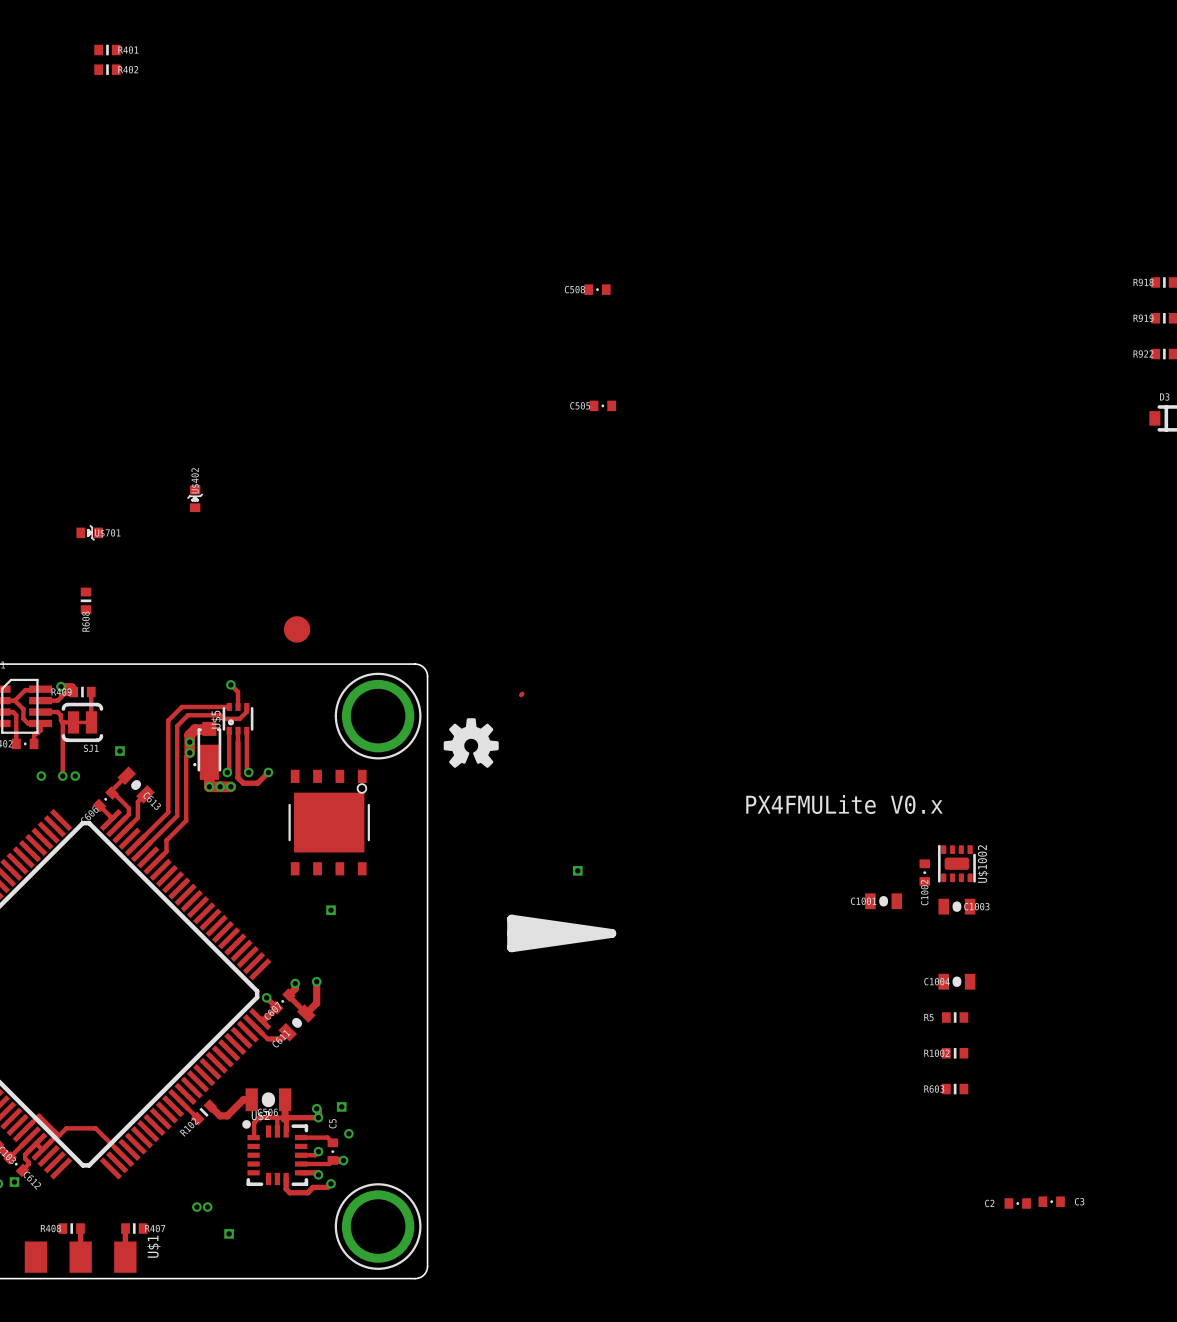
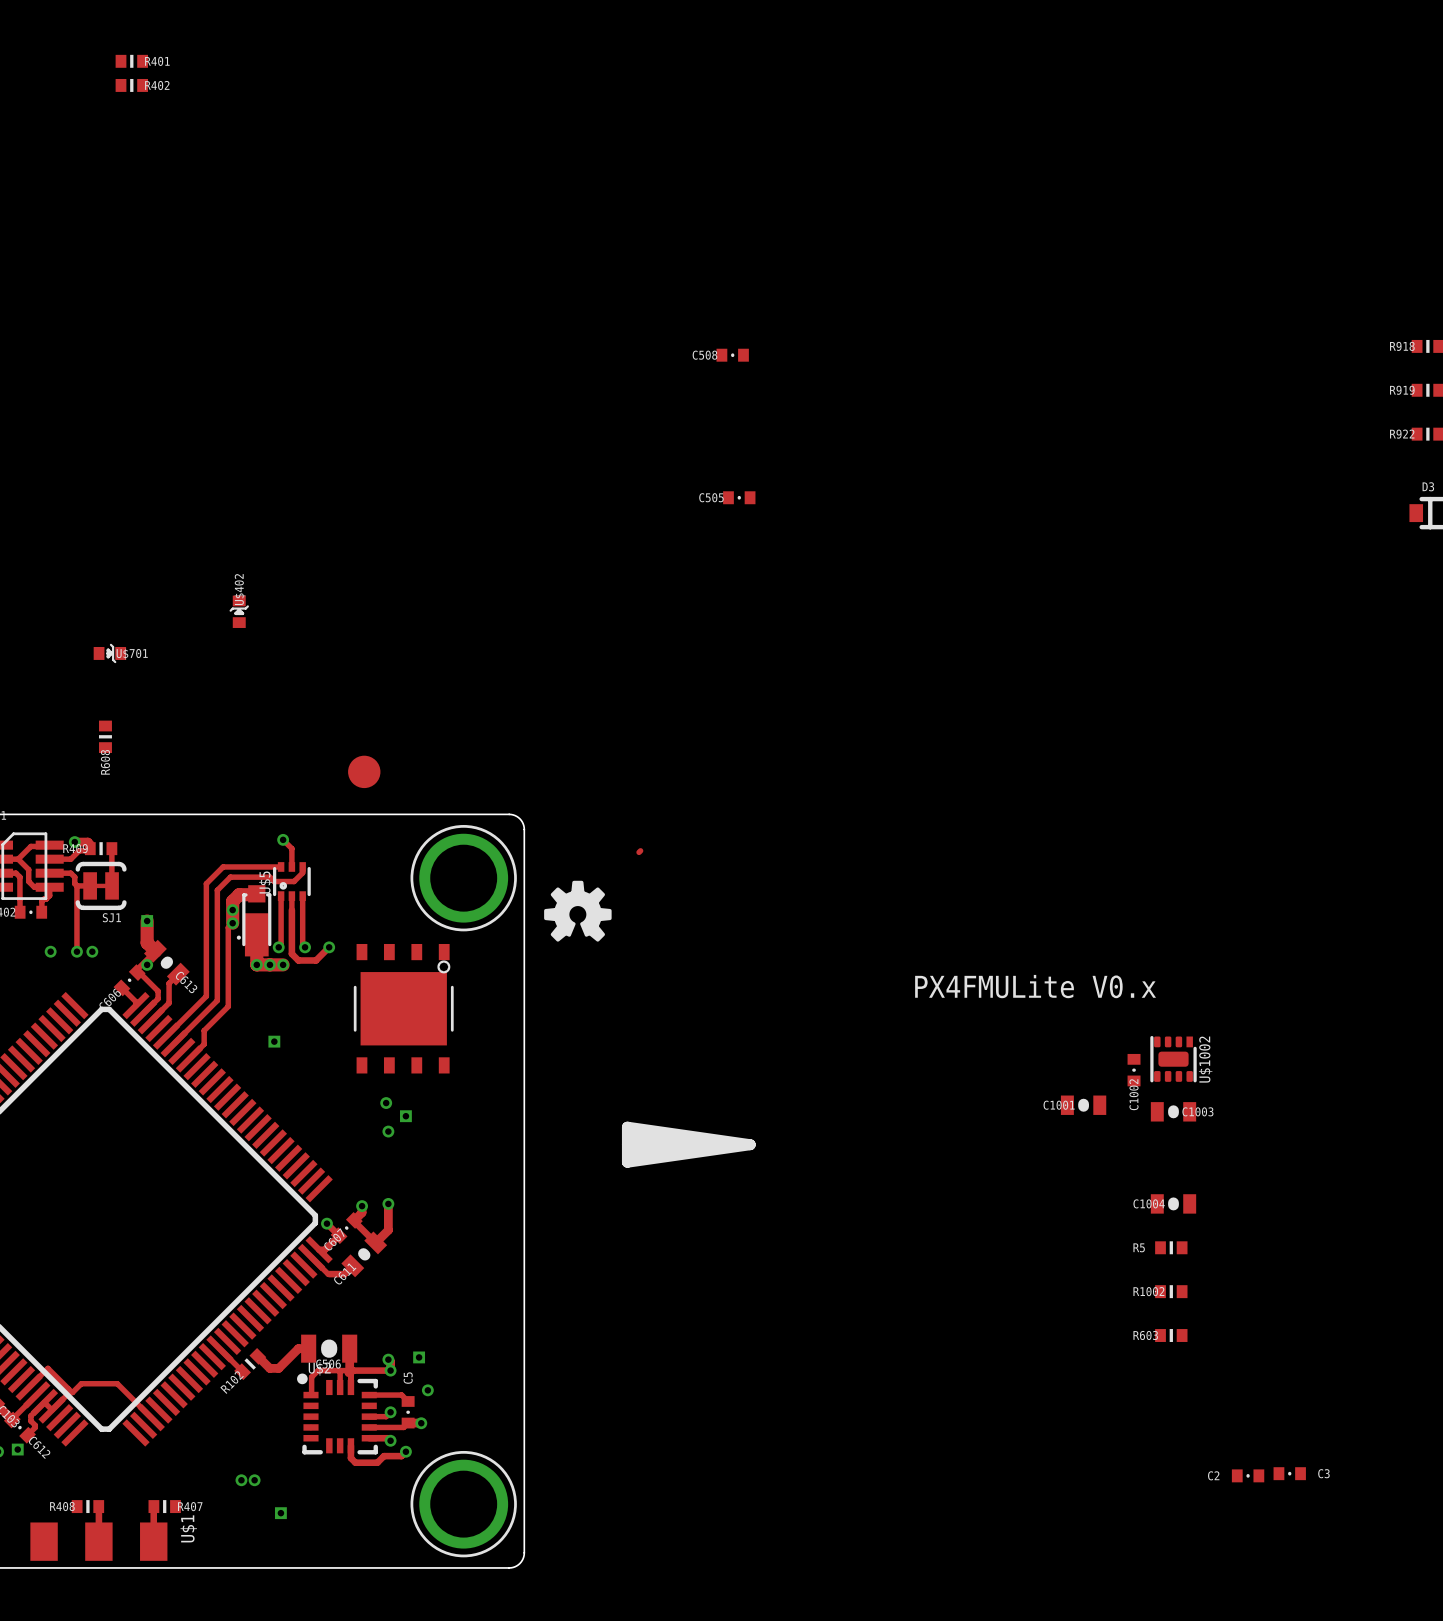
track: none -> (147, 921) (147, 942) (155, 951)
via: none -> (147, 964)
part position: (577, 870) -> (274, 1041)
via: none -> (386, 1103)
via: none -> (388, 1131)

